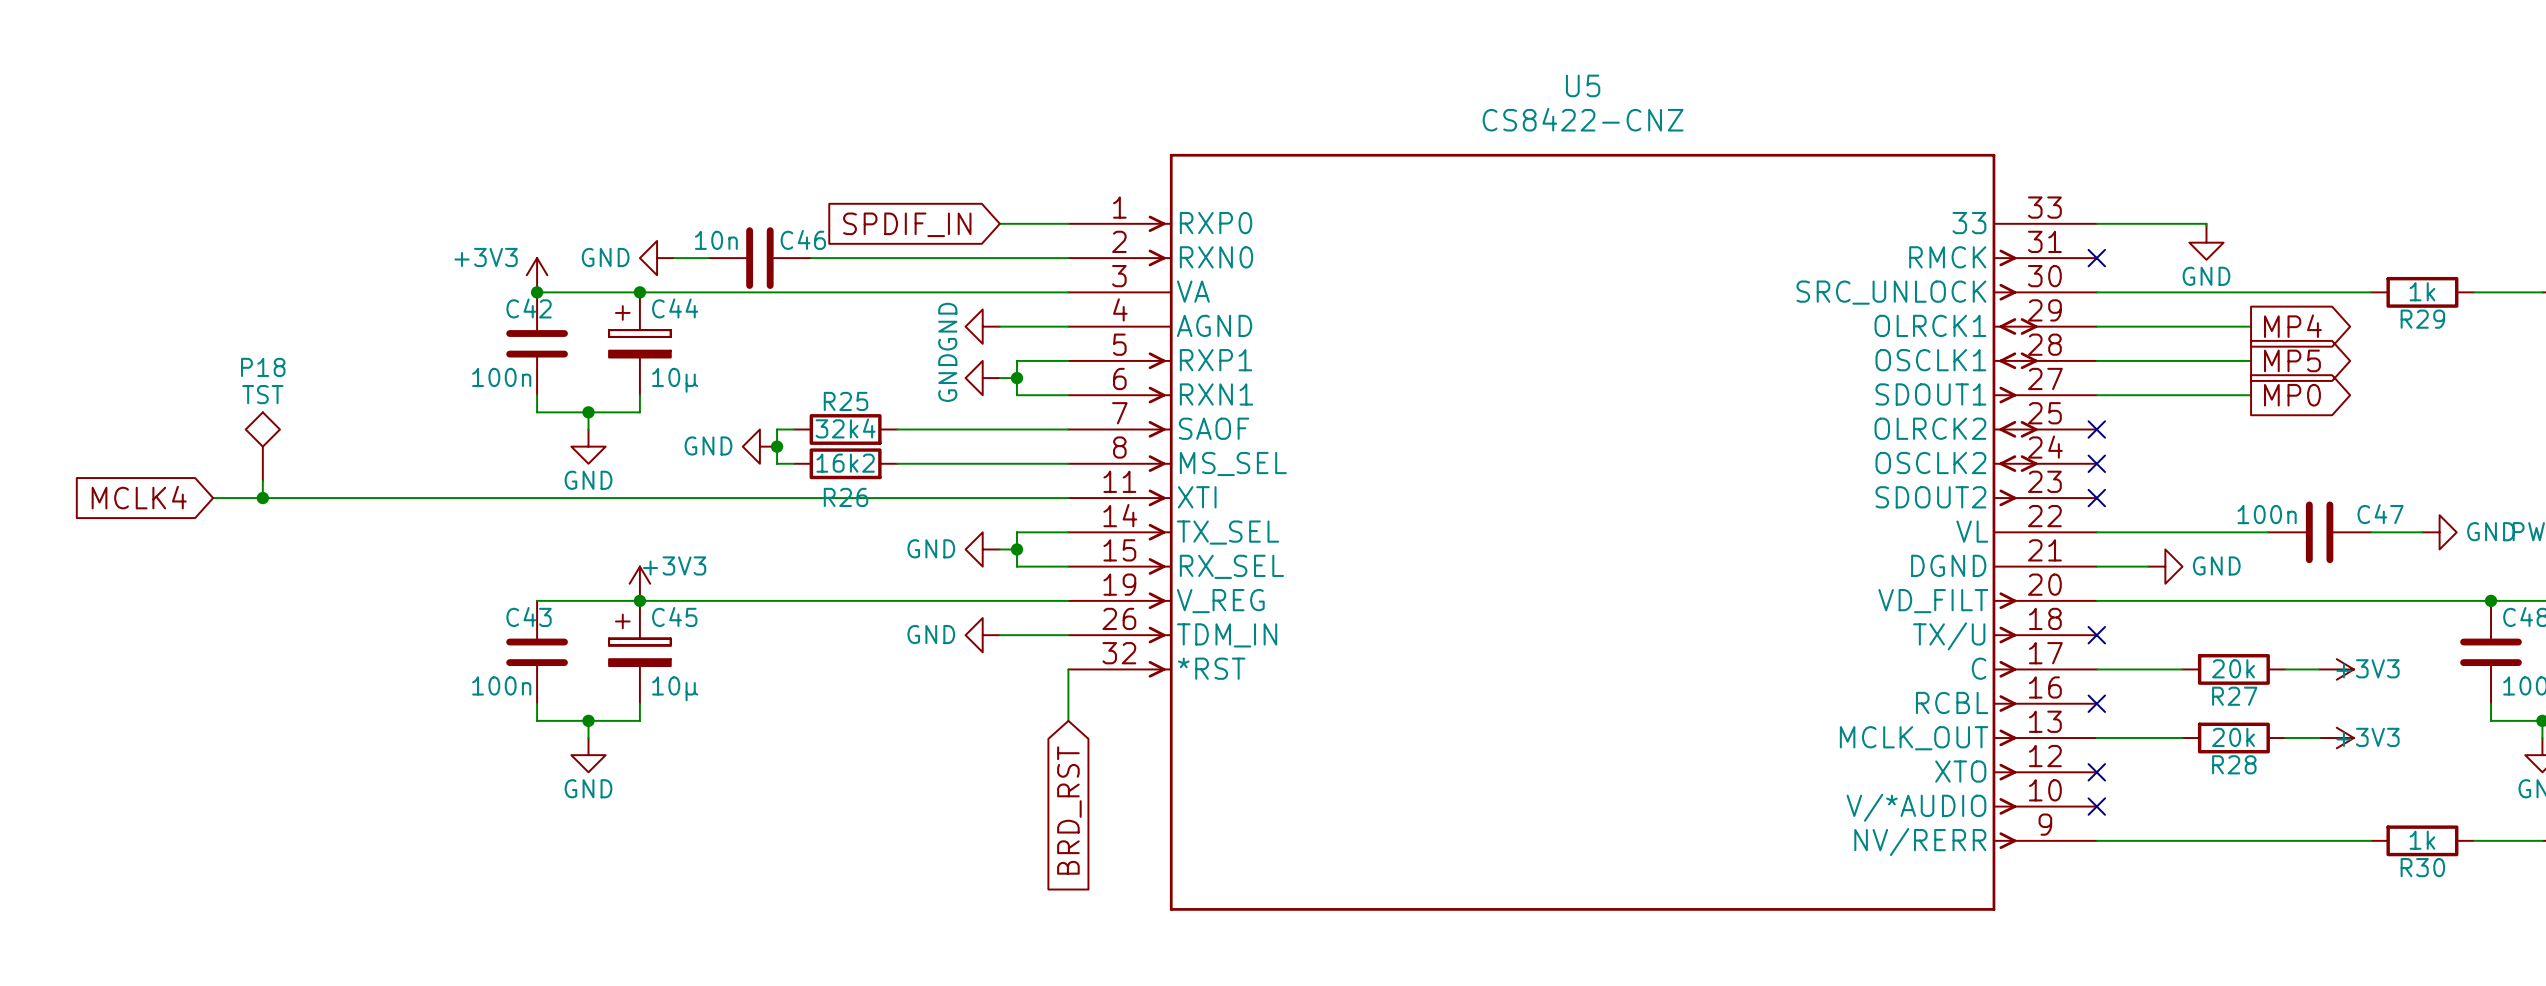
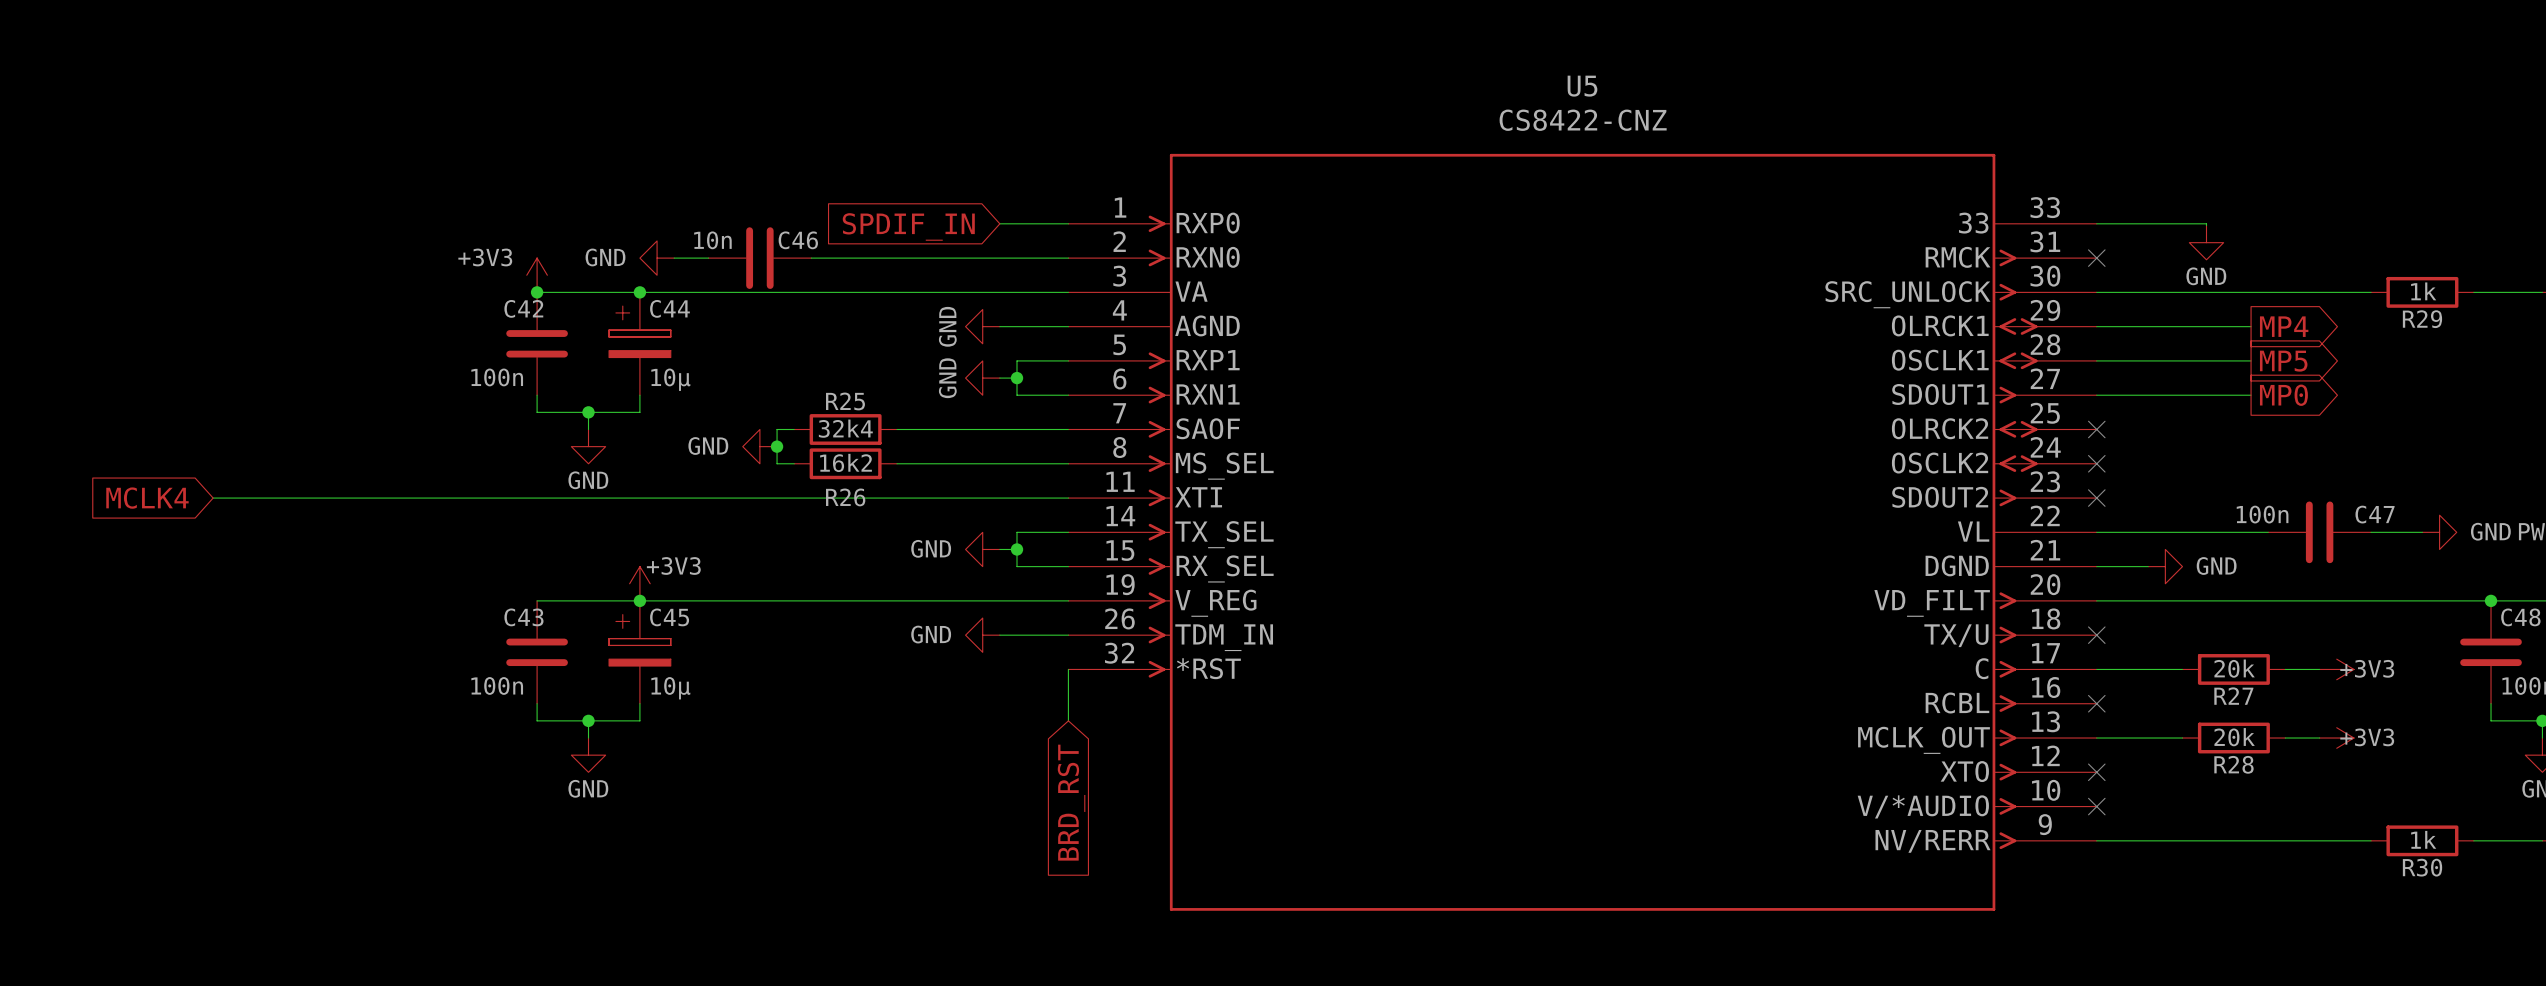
P18: TST (262, 446) -> none
wire: (262, 480) (262, 498) -> none
junction: (262, 498) -> none

